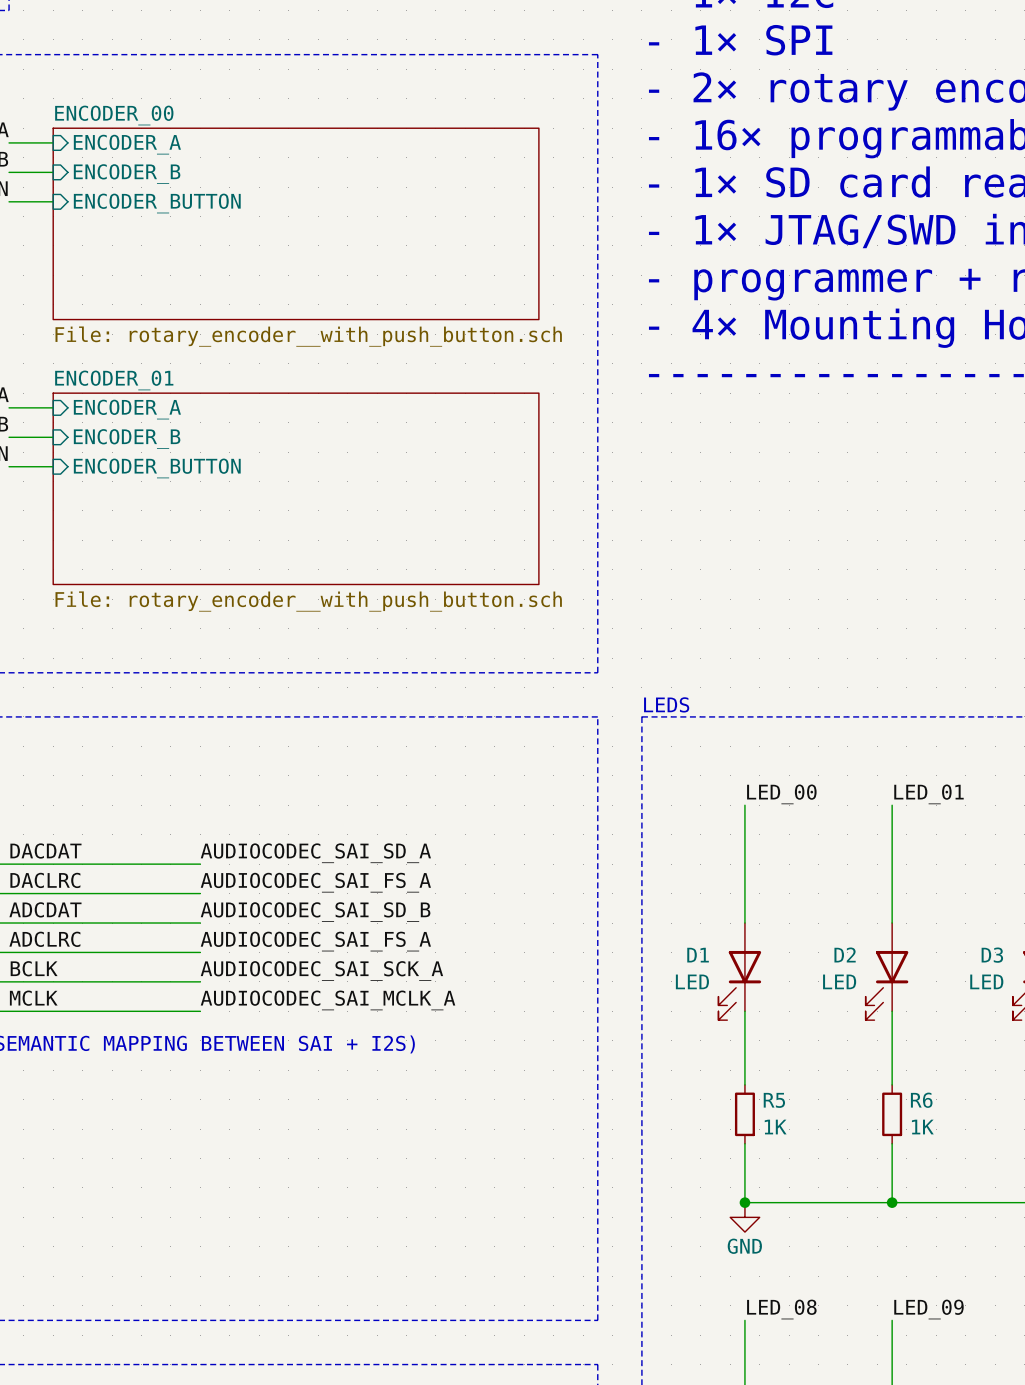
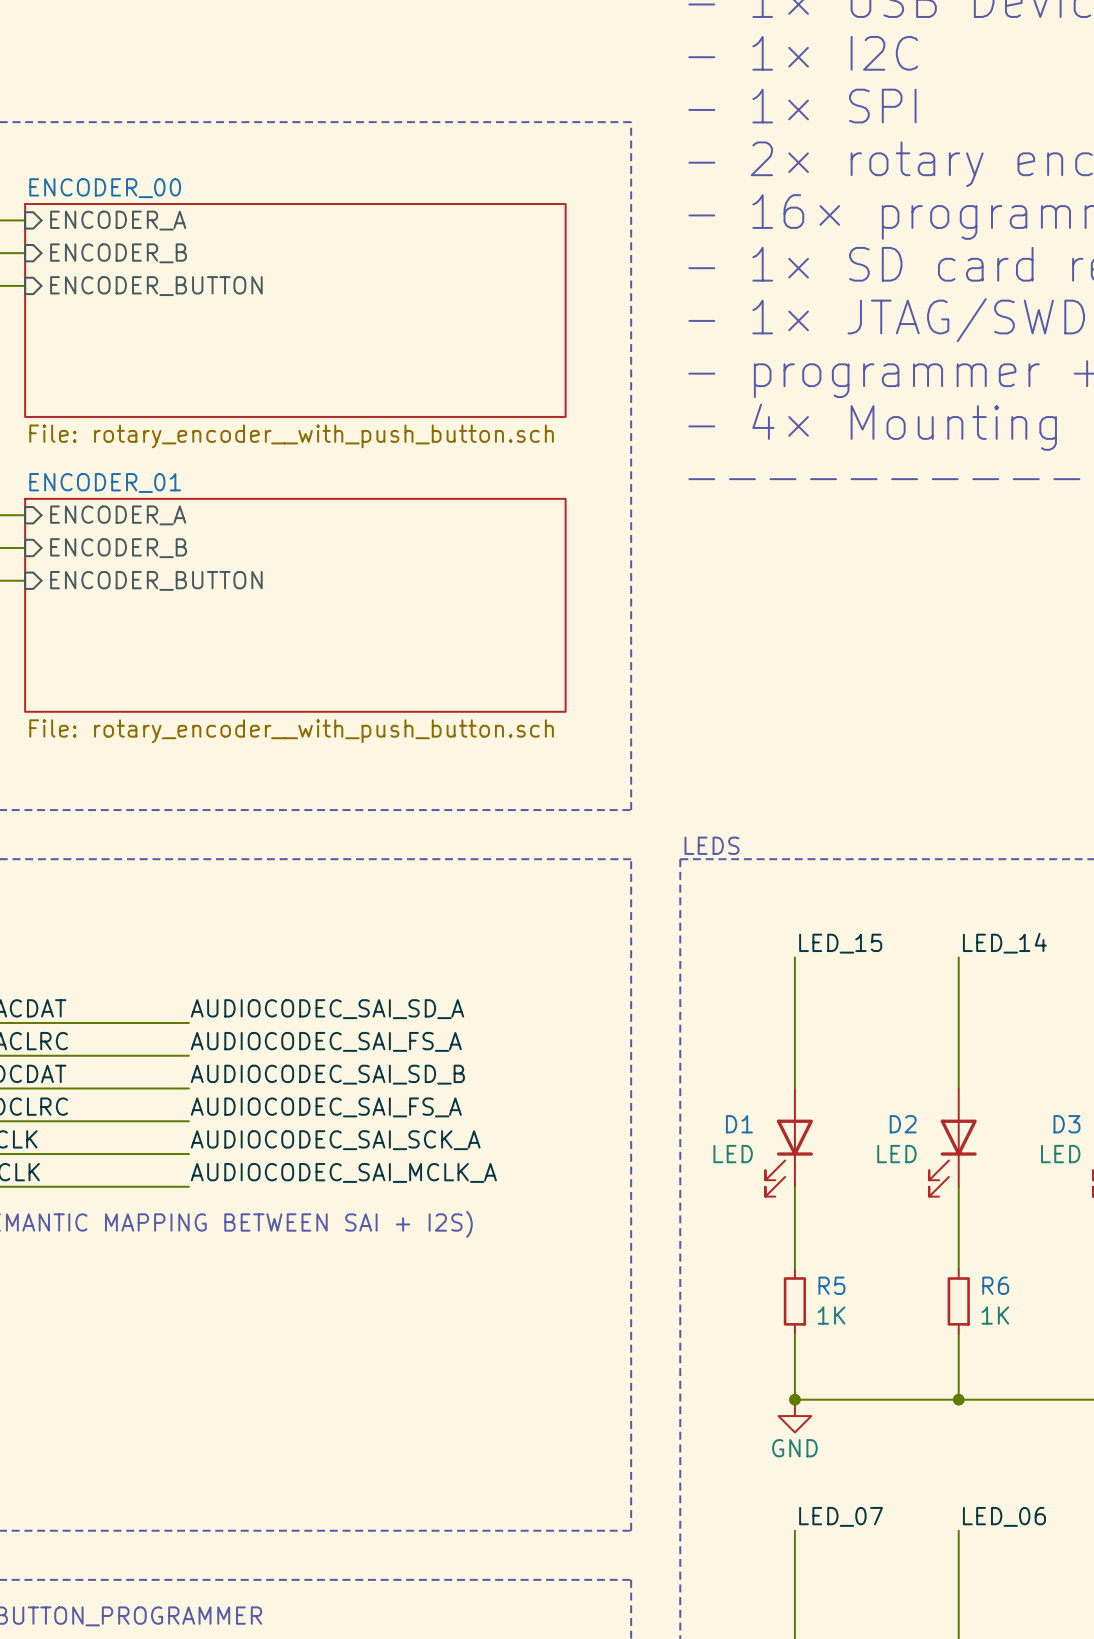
label: LED_00 (781, 794) -> LED_15 (840, 943)
label: LED_01 (928, 794) -> LED_14 (1004, 943)
label: LED_08 (781, 1309) -> LED_07 (841, 1516)
label: LED_09 (928, 1309) -> LED_06 (1004, 1516)

